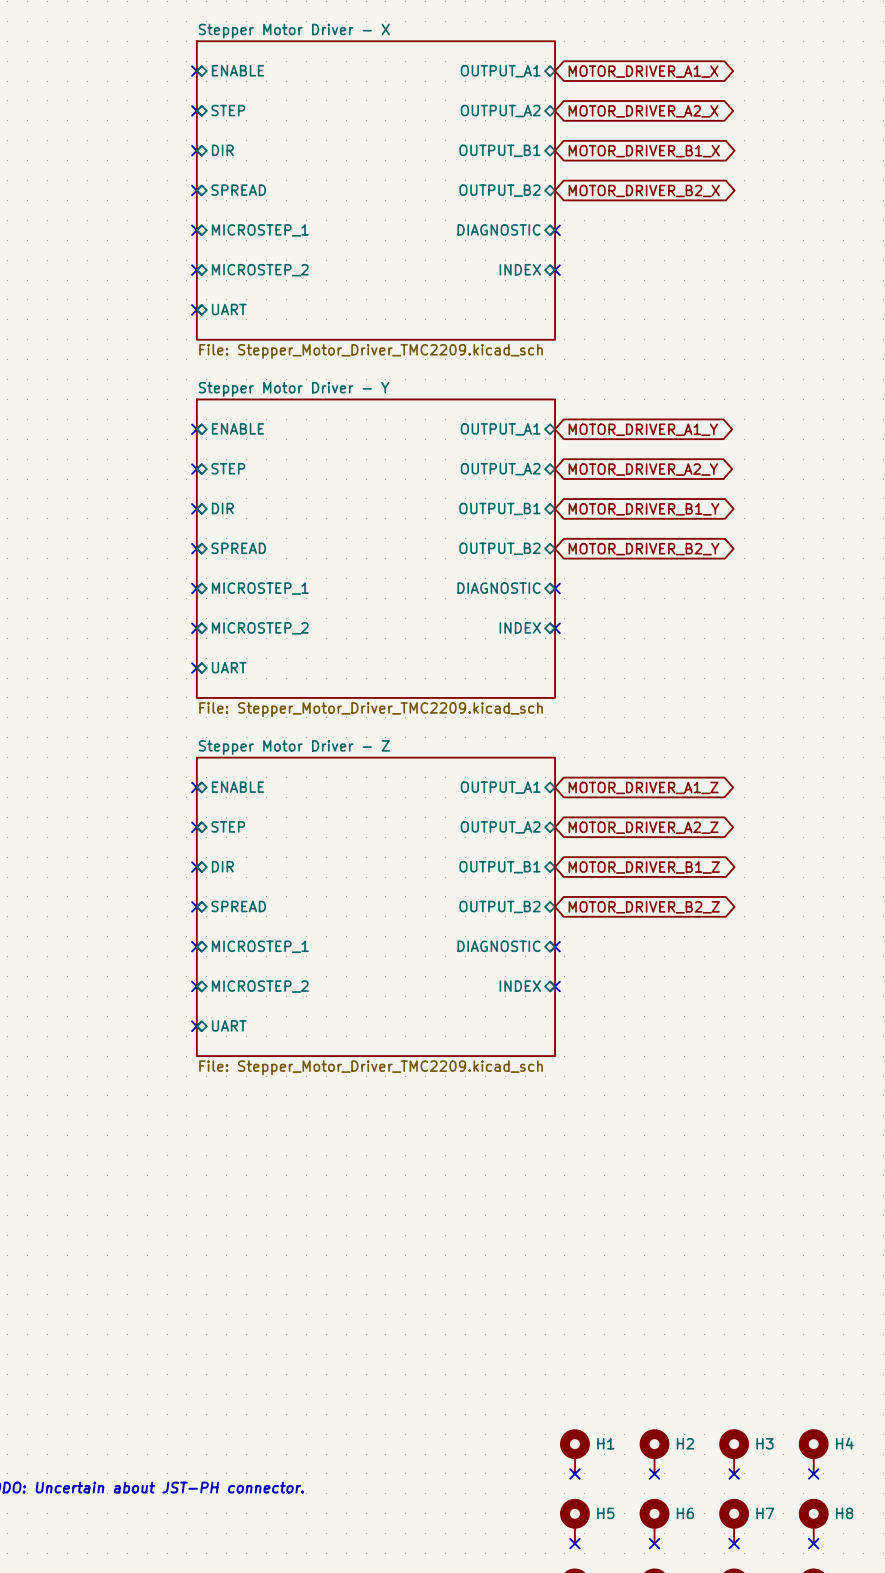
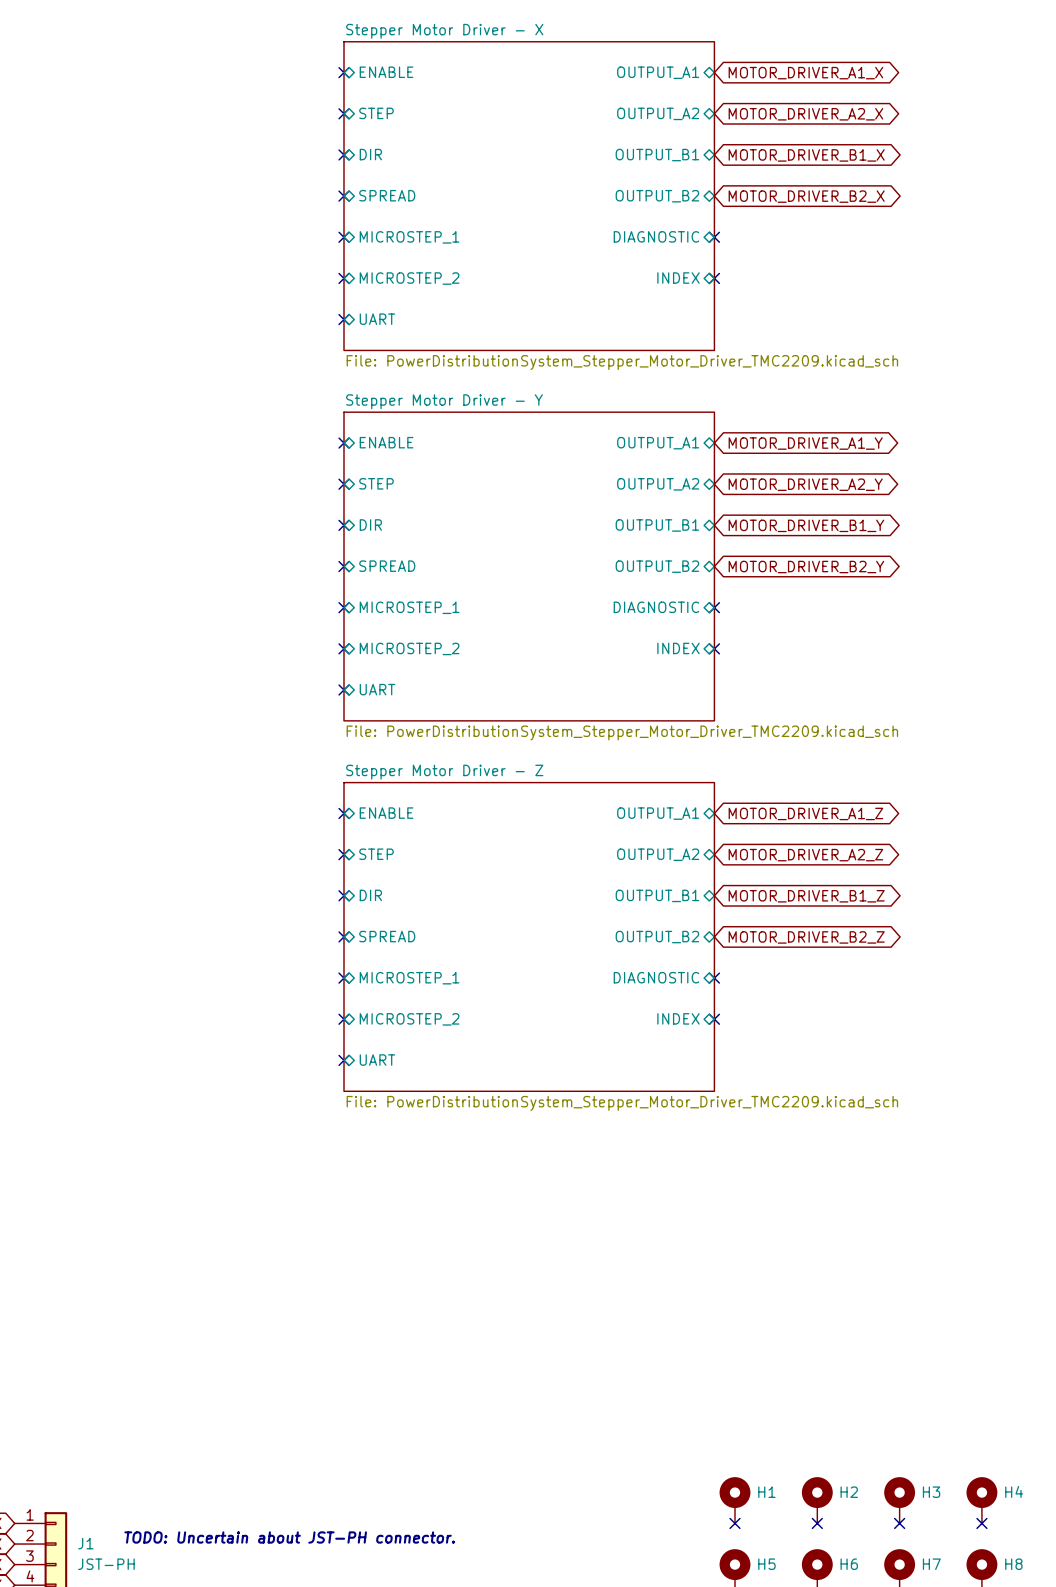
sheet Stepper Motor Driver - X value: File: Stepper_Motor_Driver_TMC2209.kicad_sch (371, 351) -> File: PowerDistributionSystem_Stepper_Motor_Driver_TMC2209.kicad_sch (622, 362)
sheet Stepper Motor Driver - Y value: File: Stepper_Motor_Driver_TMC2209.kicad_sch (371, 709) -> File: PowerDistributionSystem_Stepper_Motor_Driver_TMC2209.kicad_sch (622, 732)
sheet Stepper Motor Driver - Z value: File: Stepper_Motor_Driver_TMC2209.kicad_sch (371, 1067) -> File: PowerDistributionSystem_Stepper_Motor_Driver_TMC2209.kicad_sch (622, 1103)

